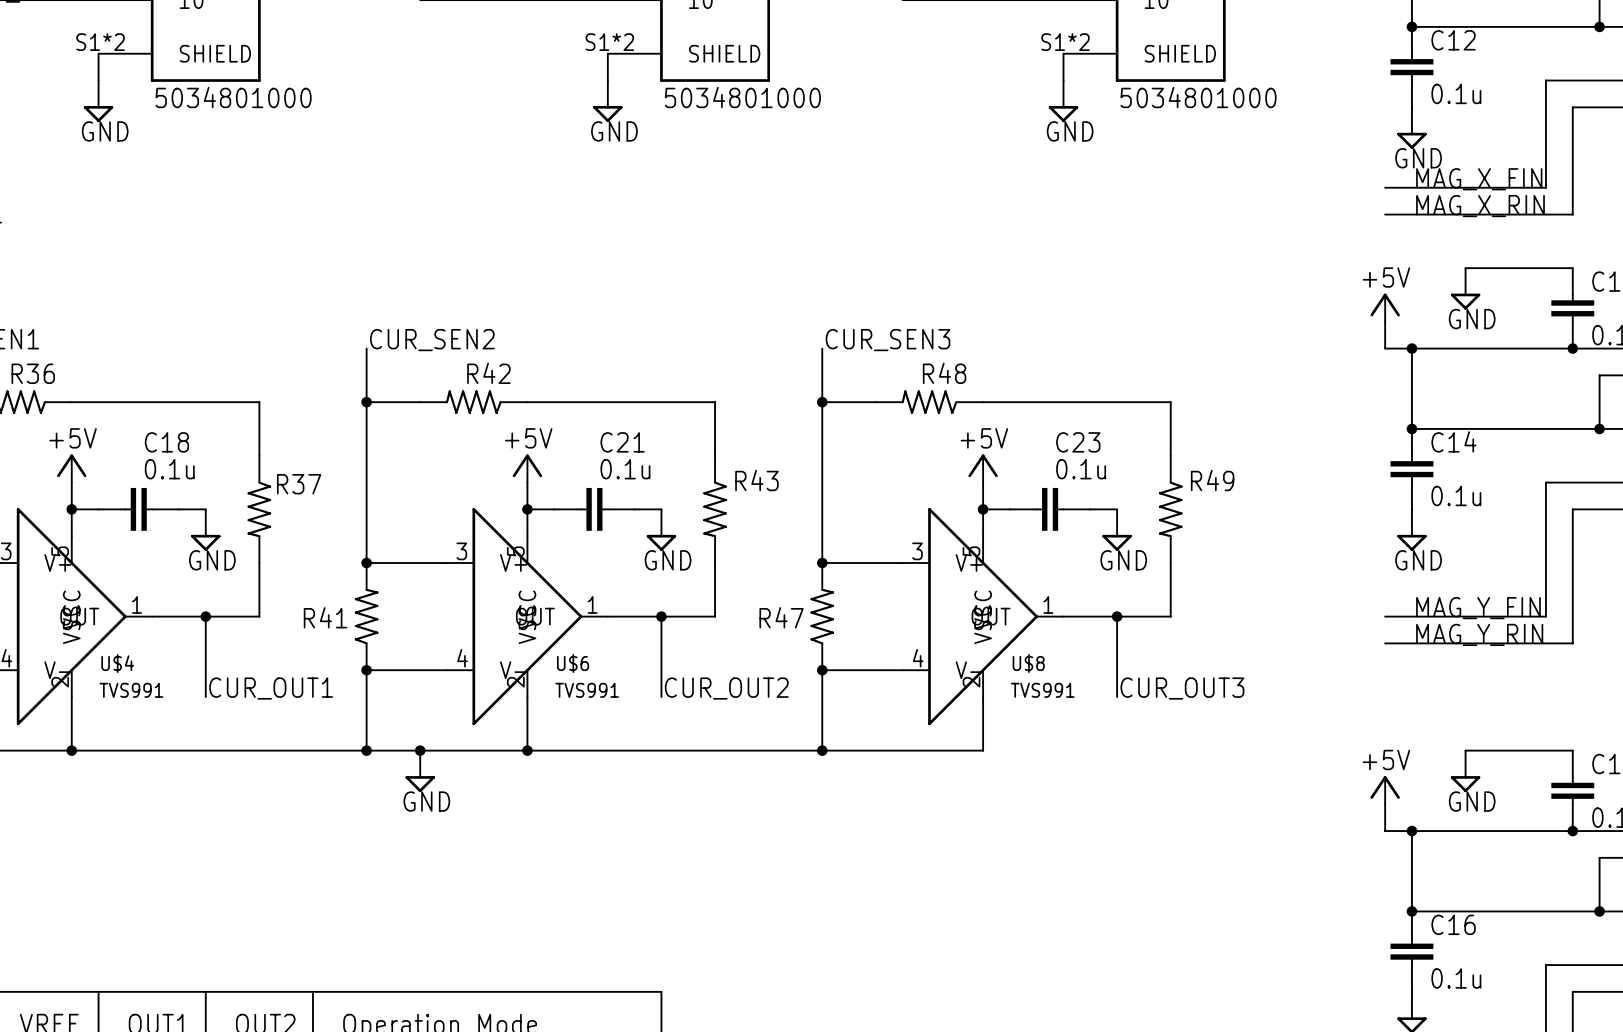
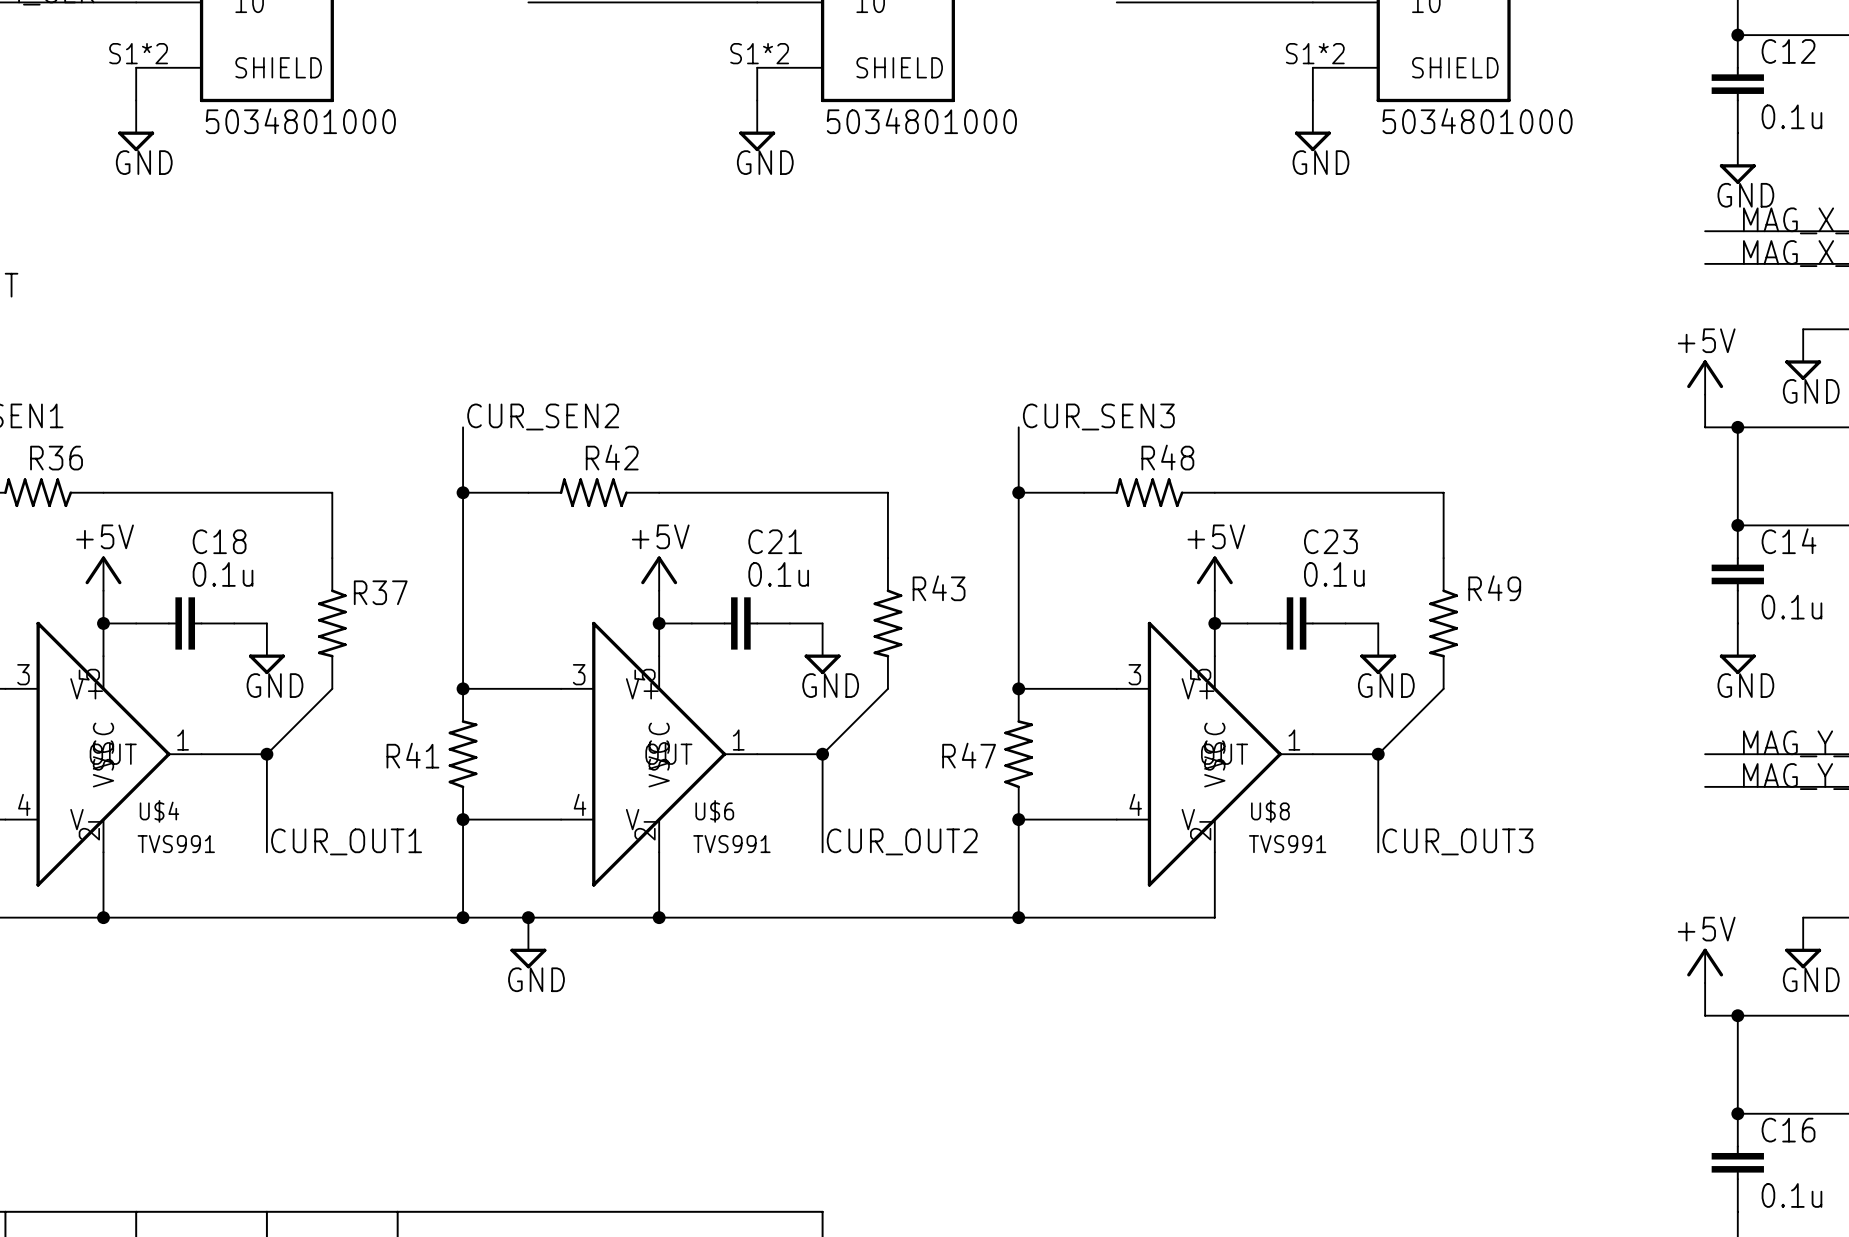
wire: (259, 563) (259, 616) (205, 616) -> (332, 688) (266, 754)
wire: (715, 563) (715, 616) (661, 616) -> (887, 688) (822, 754)
wire: (1170, 563) (1170, 616) (1117, 616) -> (1443, 688) (1378, 754)

